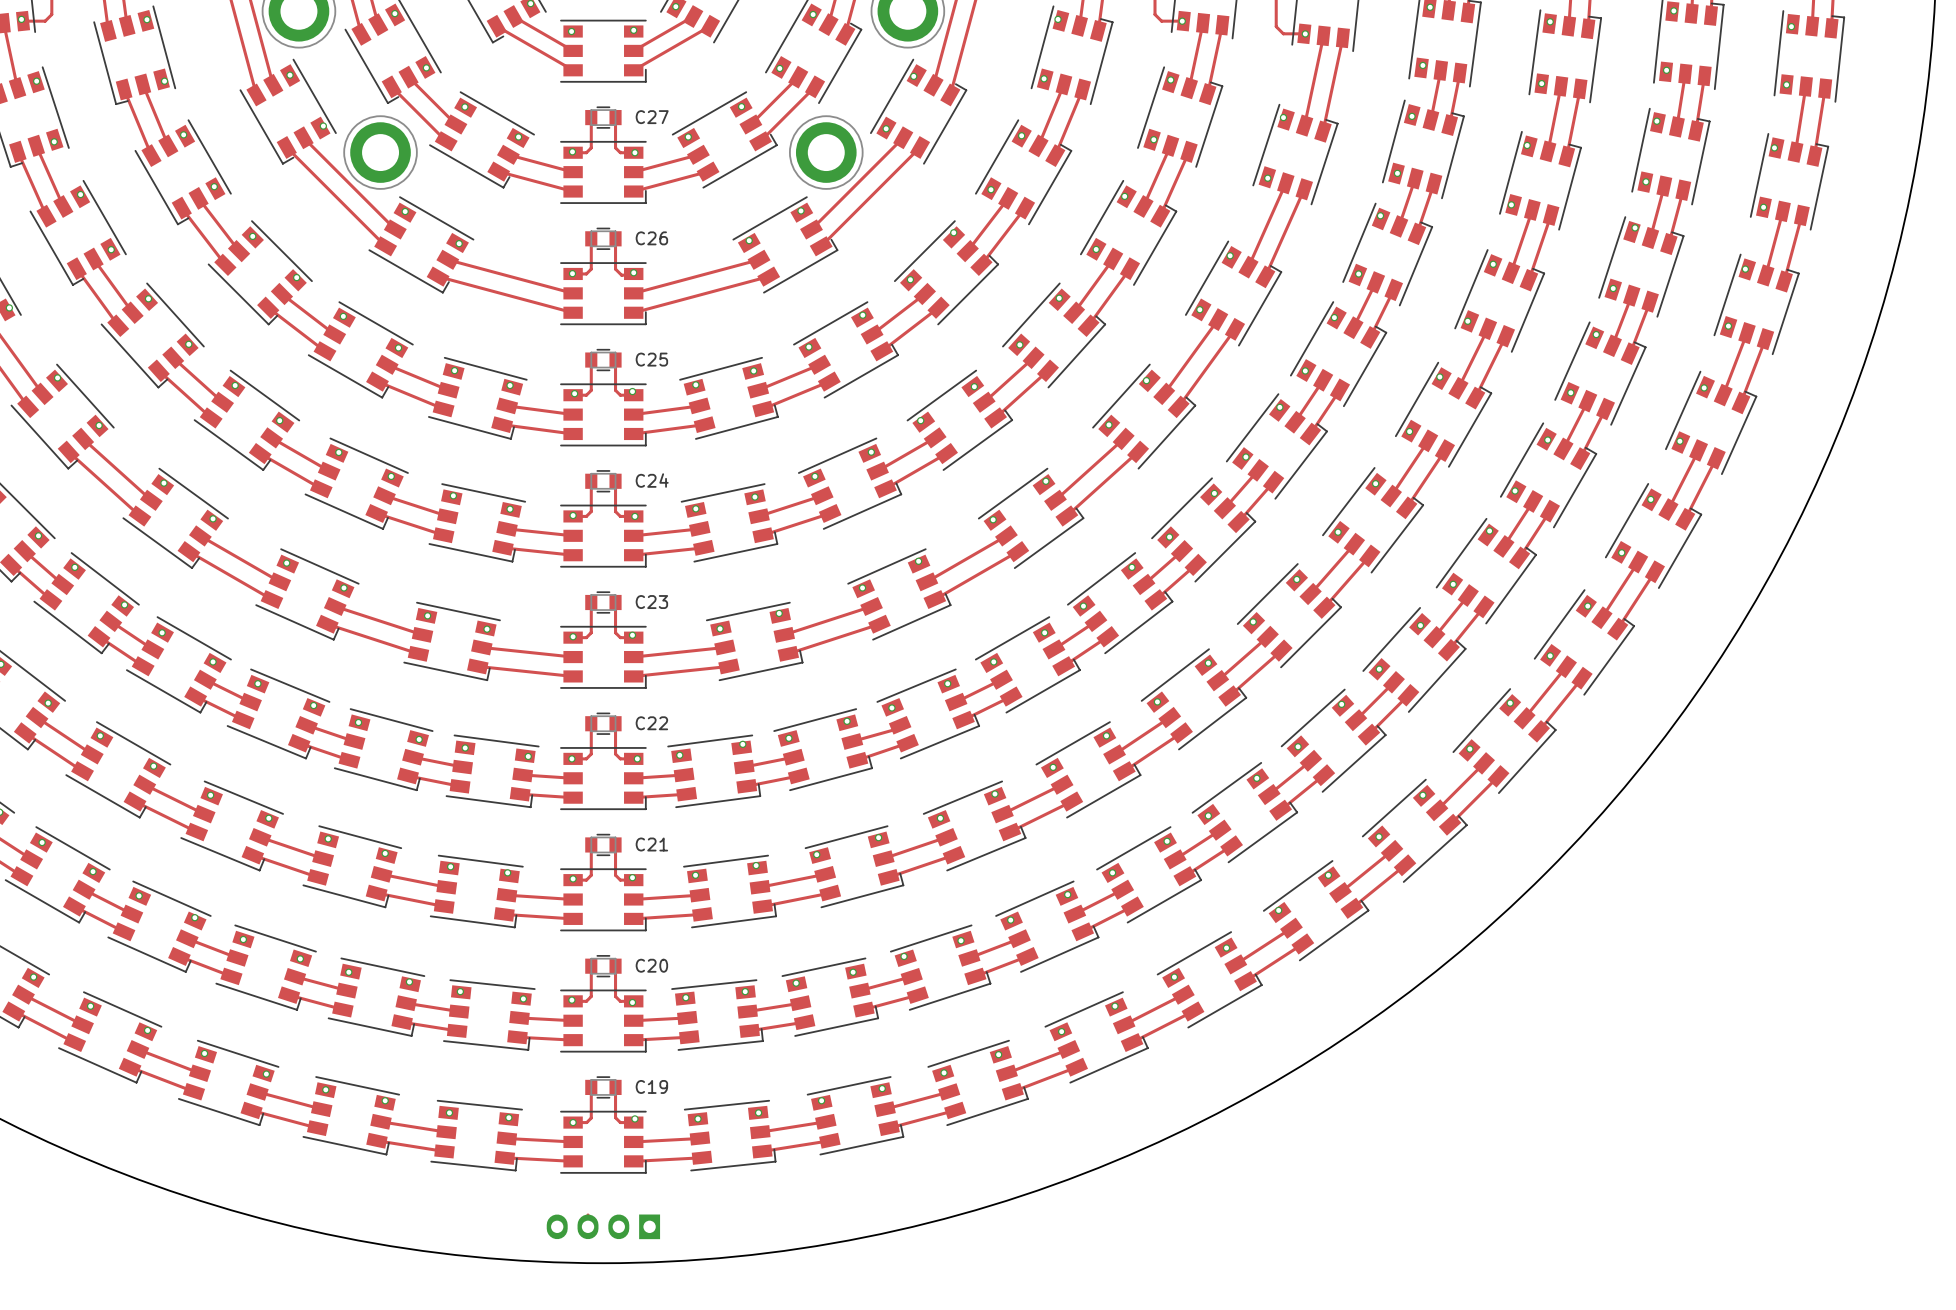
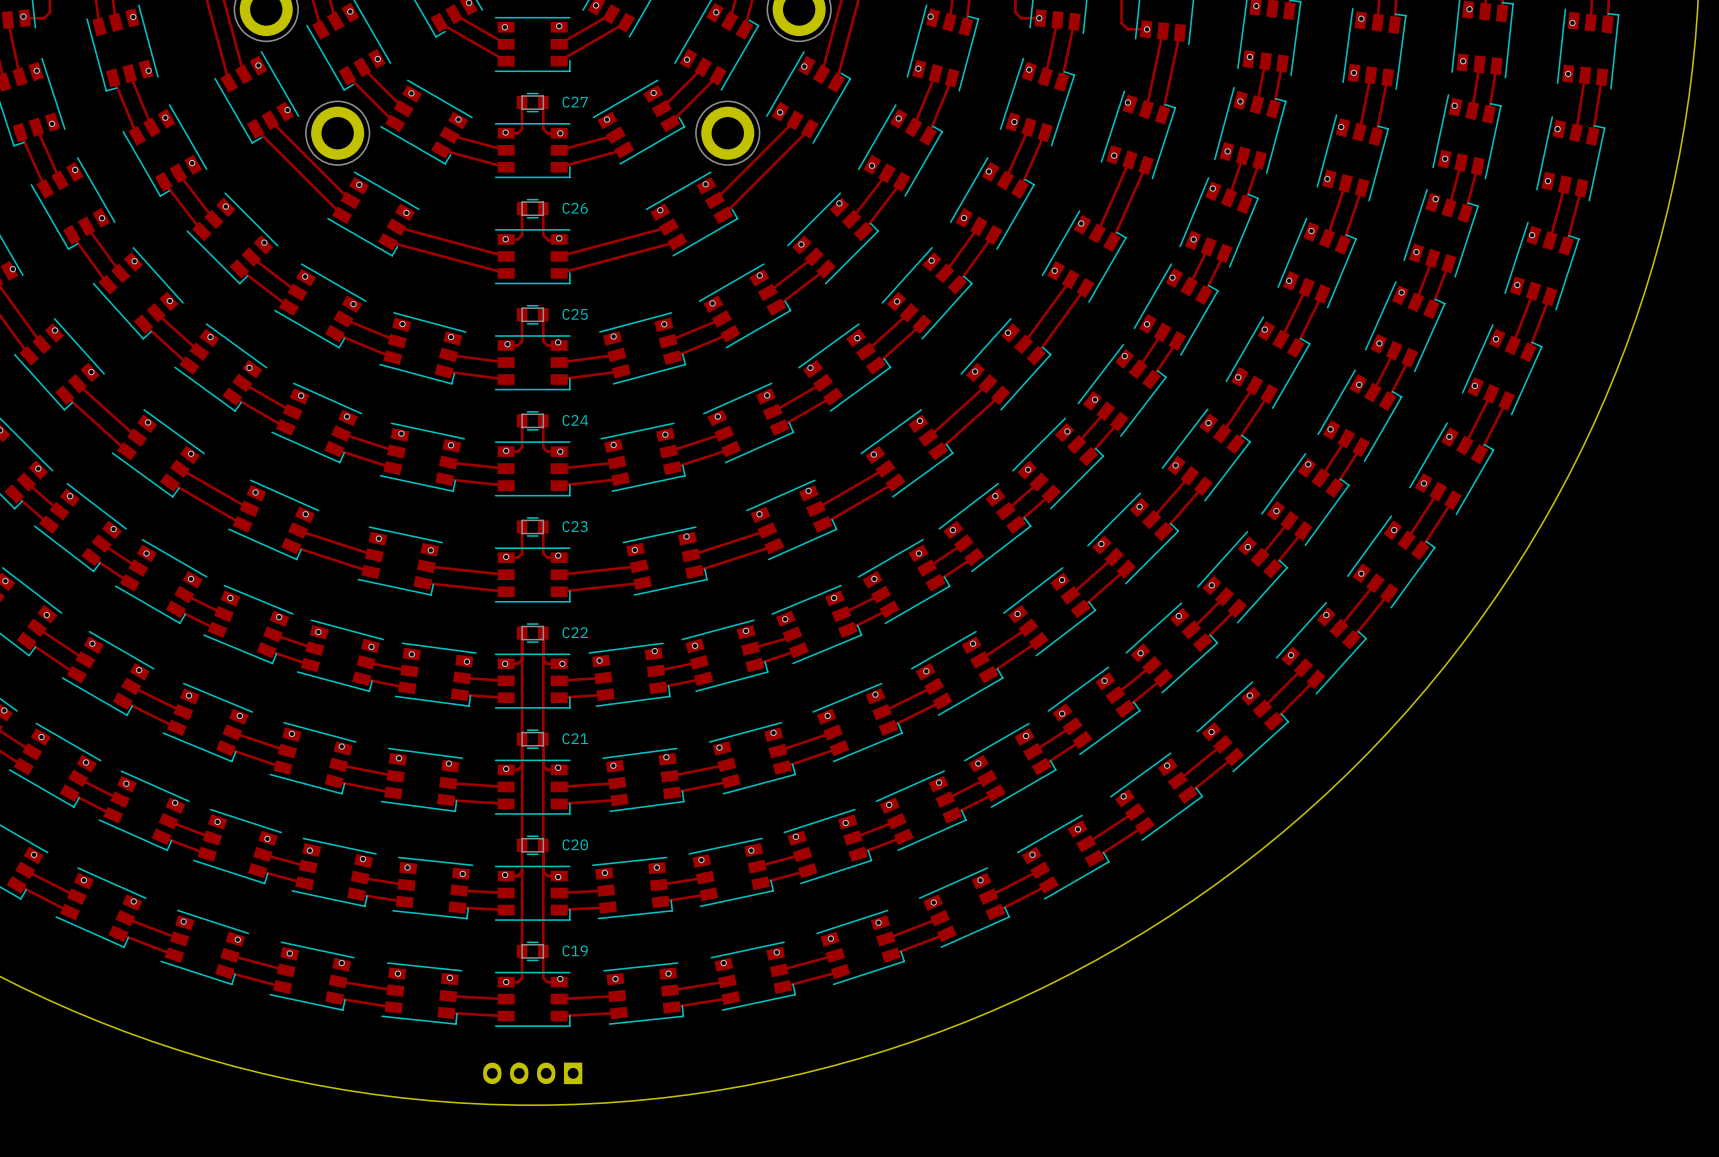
track: none -> (522, 659) (522, 739)
track: none -> (543, 659) (543, 739)
track: none -> (522, 765) (522, 845)
track: none -> (543, 765) (543, 845)
track: none -> (522, 871) (522, 951)
track: none -> (543, 871) (543, 951)

